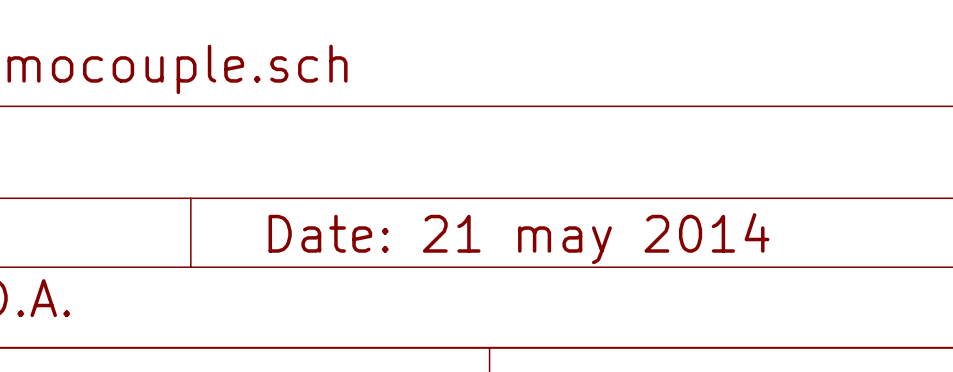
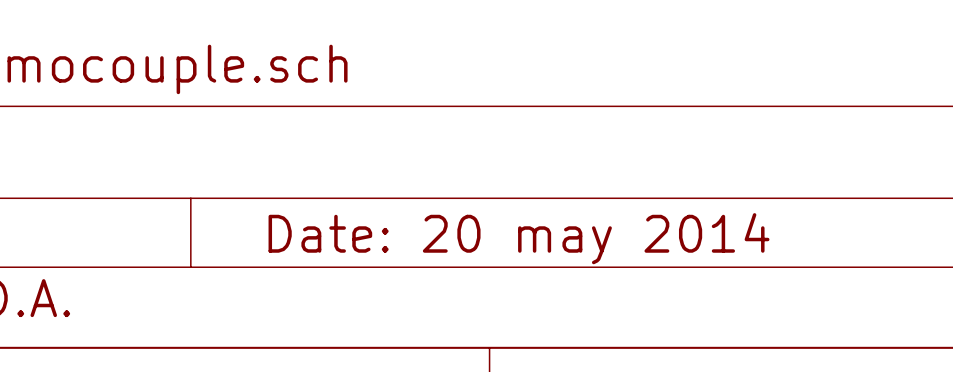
title block: Date: 21 may 2014 (519, 238) -> Date: 20 may 2014 (519, 238)

